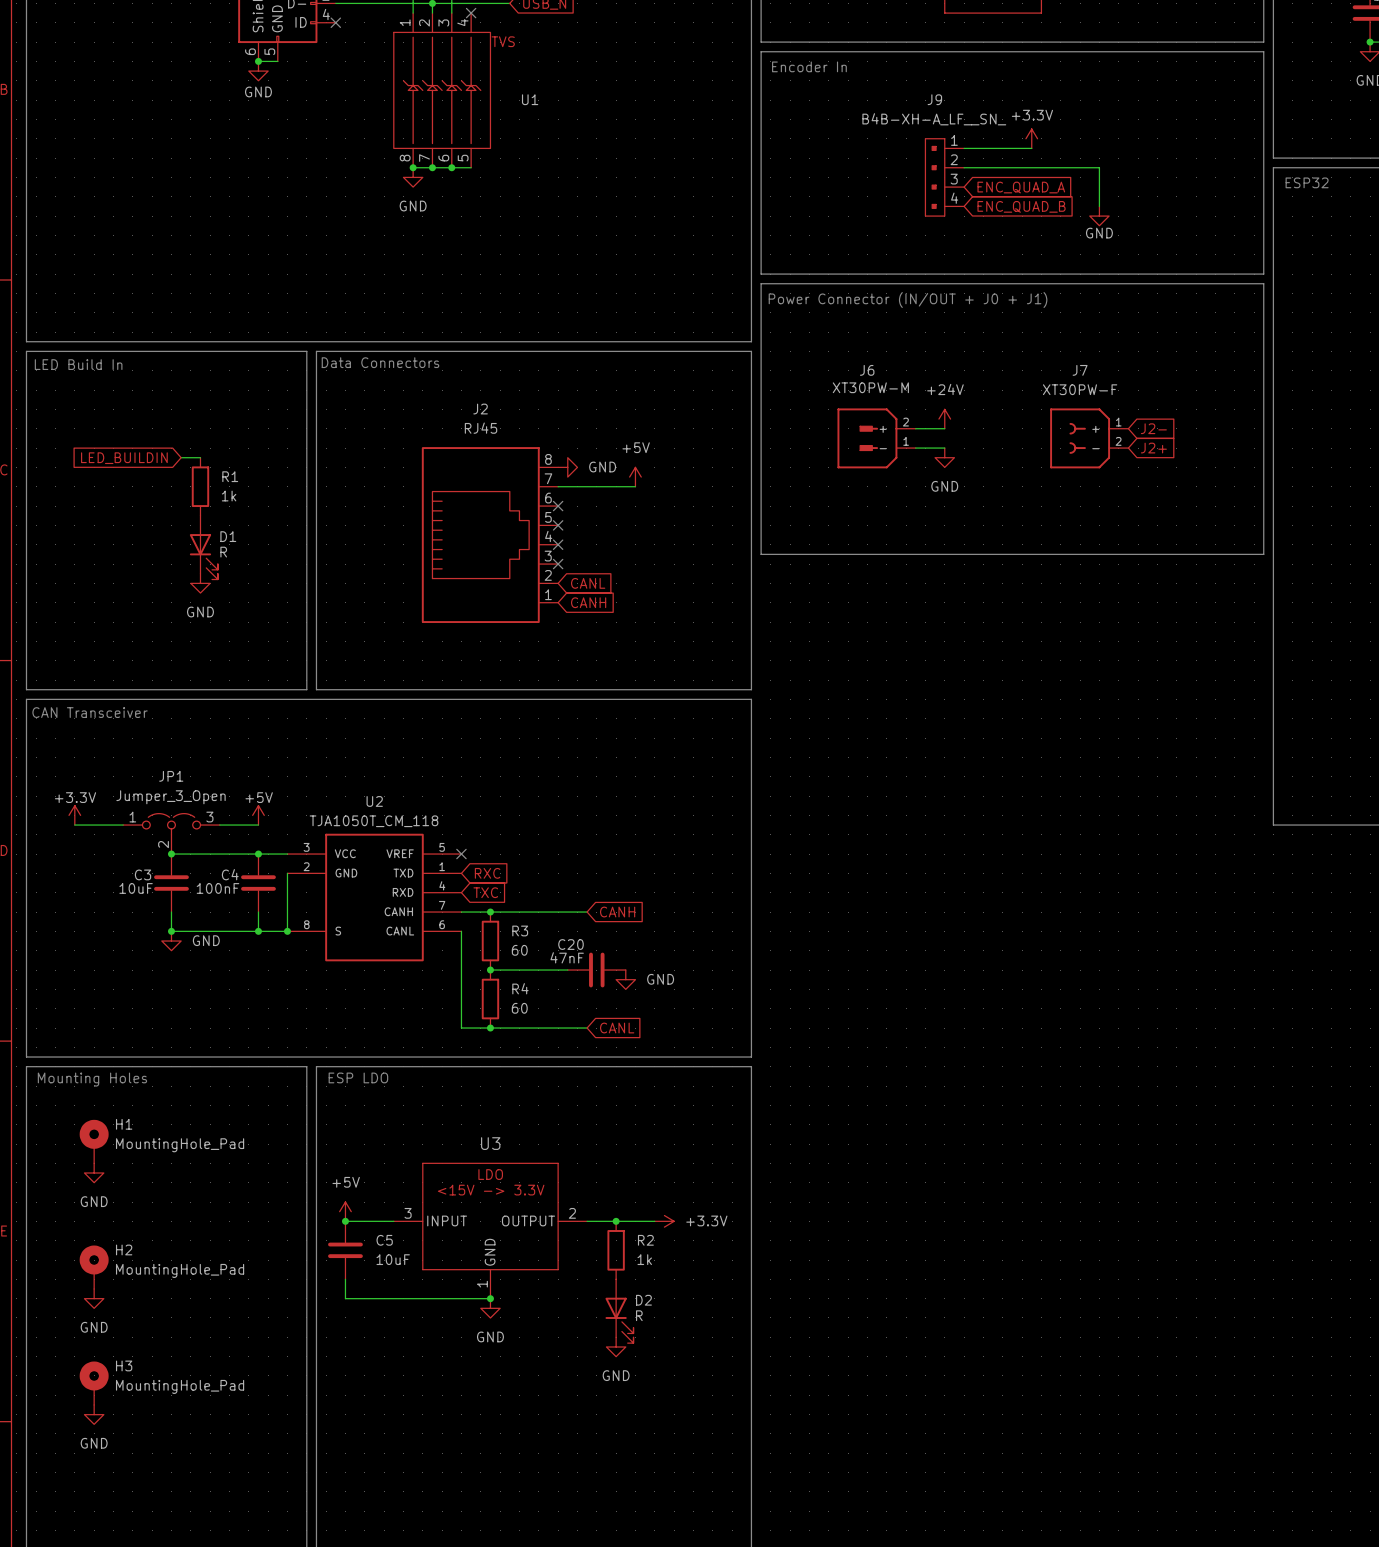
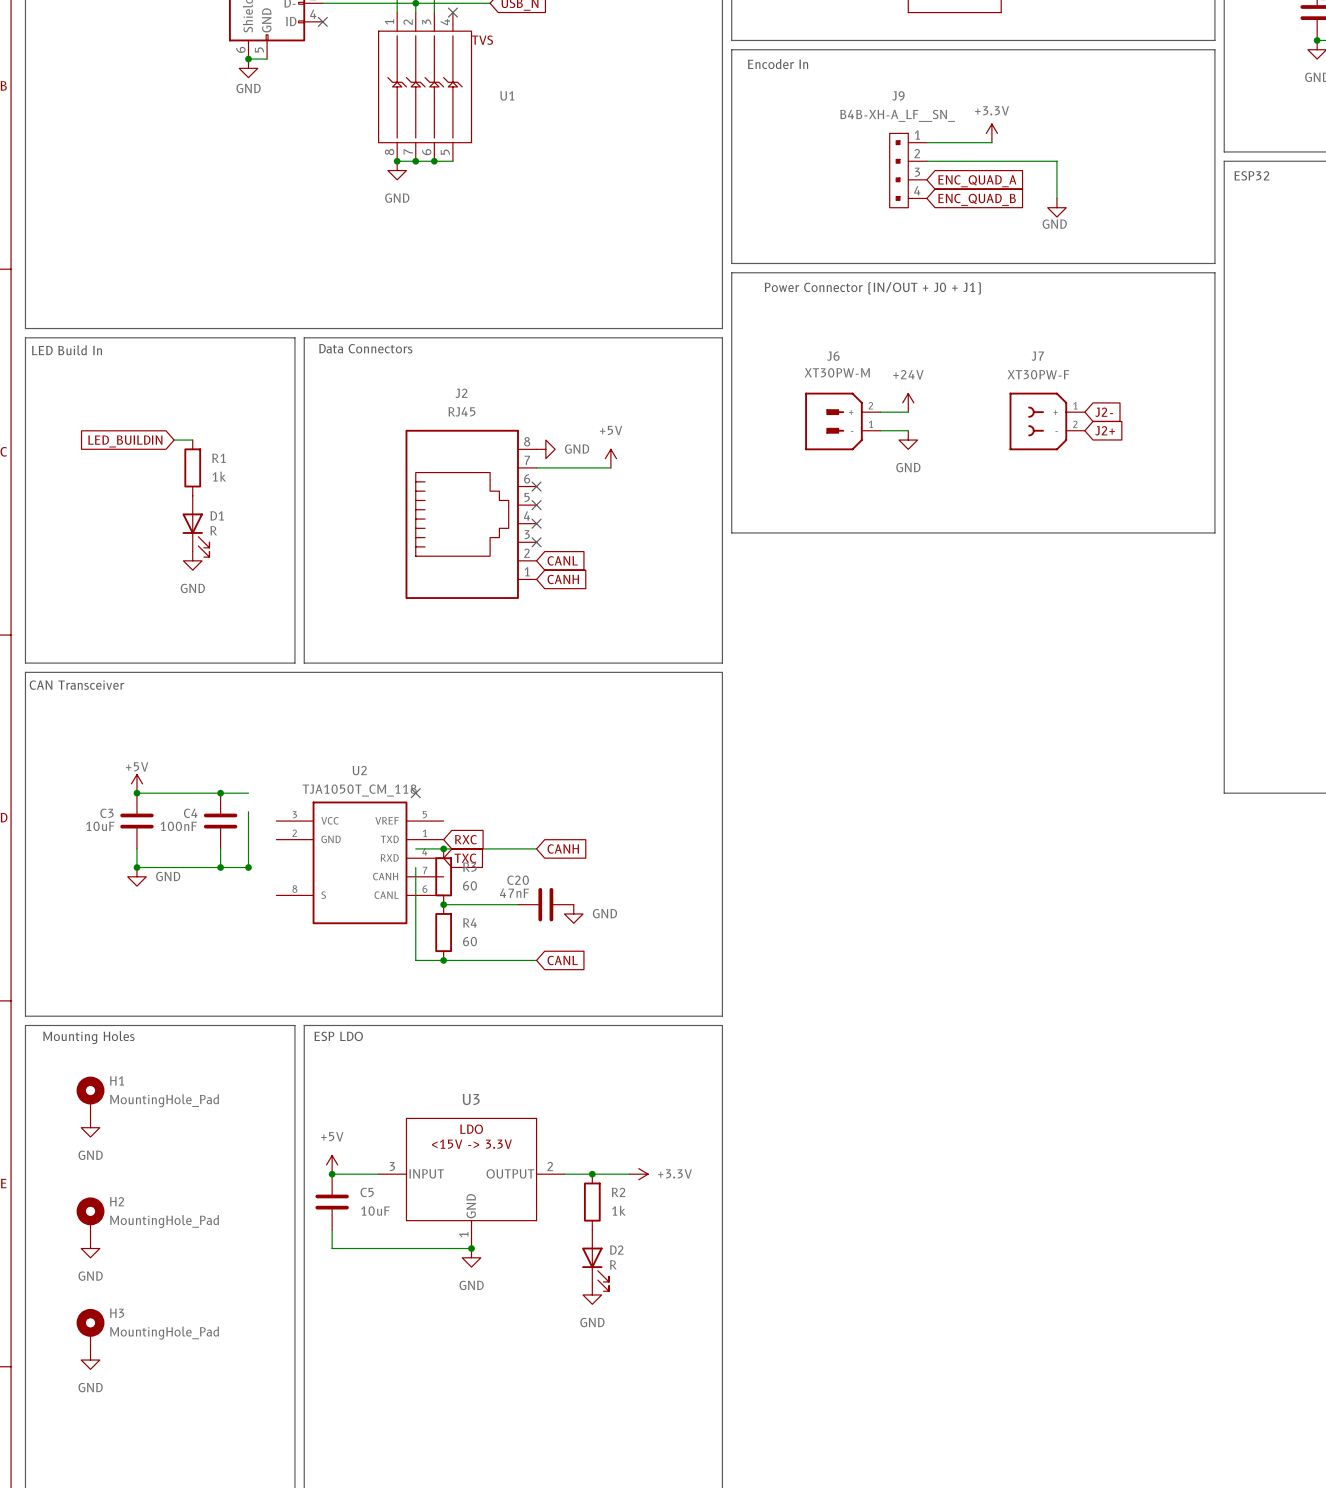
power symbol: +3.3V (74, 815) -> none
power symbol position: +5V (258, 815) -> +5V (136, 783)
wire: (74, 825) (123, 825) -> none
wire: none -> (136, 793) (211, 793)
junction: none -> (136, 793)
junction: none -> (220, 793)
JP1: Jumper_3_Open (171, 833) -> none
wire: (171, 854) (287, 854) -> none
junction: (171, 854) -> none
junction: (258, 854) -> none
no-connect mark position: (461, 854) -> (415, 793)
wire: (287, 873) (287, 931) (171, 931) (171, 912) -> (248, 811) (248, 867) (136, 867) (136, 848)
C3 position: (171, 883) -> (136, 821)
C4 position: (258, 883) -> (220, 821)
junction: none -> (443, 848)
junction: none -> (136, 867)
junction: none -> (220, 867)
junction: none -> (248, 867)
wire: (258, 912) (258, 931) -> (220, 848) (220, 867)
wire: (461, 912) (587, 912) -> (415, 848) (536, 848)
junction: (490, 912) -> none
global label position: CANH (617, 912) -> CANH (563, 848)
junction: (171, 931) -> none
junction: (258, 931) -> none
junction: (287, 931) -> none
wire: (461, 931) (461, 1028) (587, 1028) -> (415, 867) (415, 960) (536, 960)
power symbol position: GND (171, 941) -> GND (136, 876)
junction: none -> (443, 904)
R3 position: (490, 941) -> (443, 876)
wire: (490, 970) (567, 970) -> (443, 904) (517, 904)
junction: (490, 970) -> none
C20 position: (596, 970) -> (545, 904)
power symbol position: GND (625, 979) -> GND (573, 913)
junction: none -> (443, 960)
R4 position: (490, 999) -> (443, 932)
junction: (490, 1028) -> none
global label position: CANL (617, 1028) -> CANL (562, 960)

